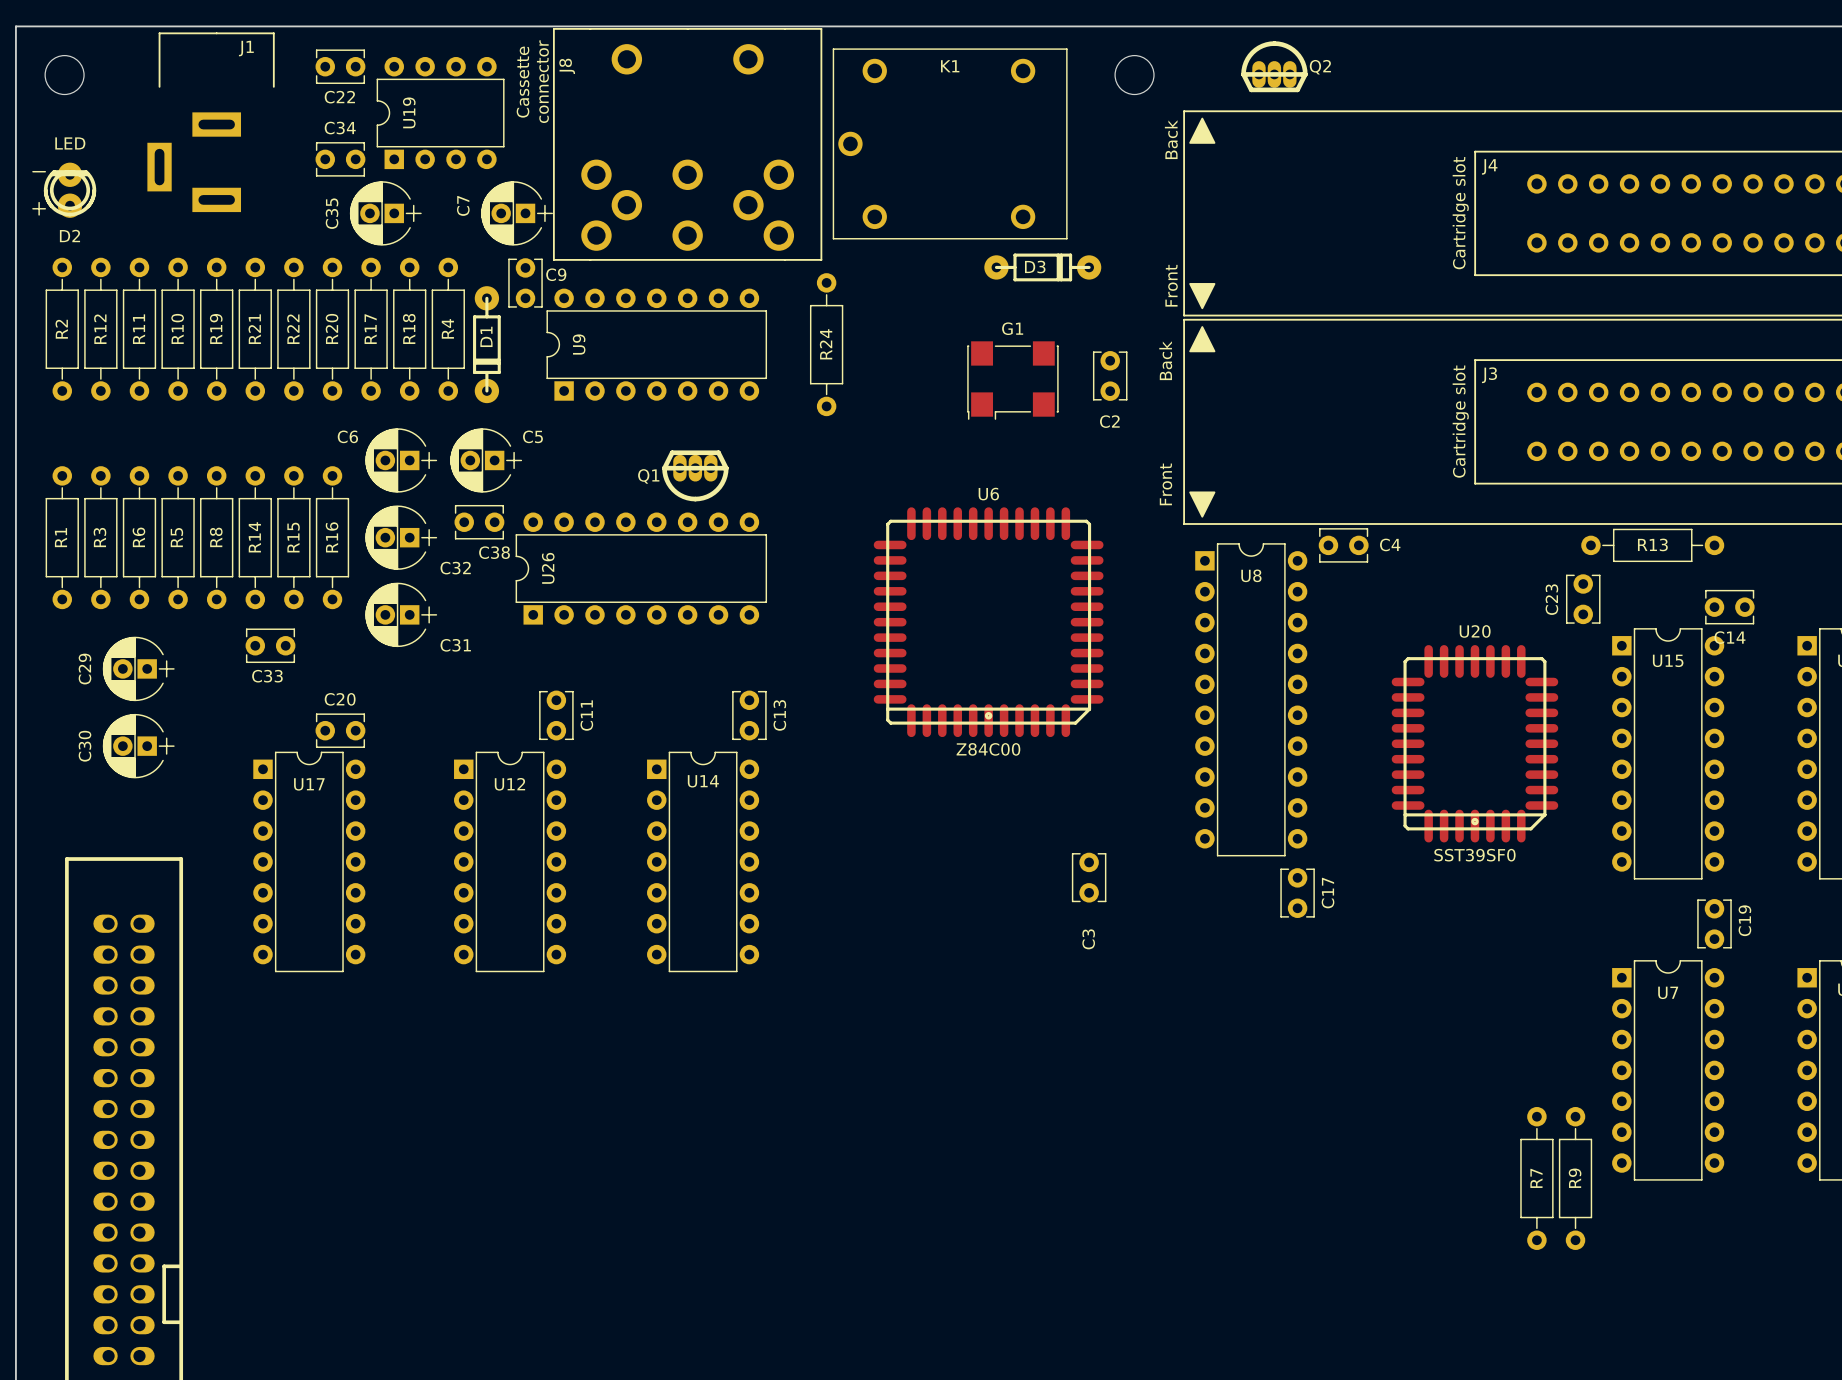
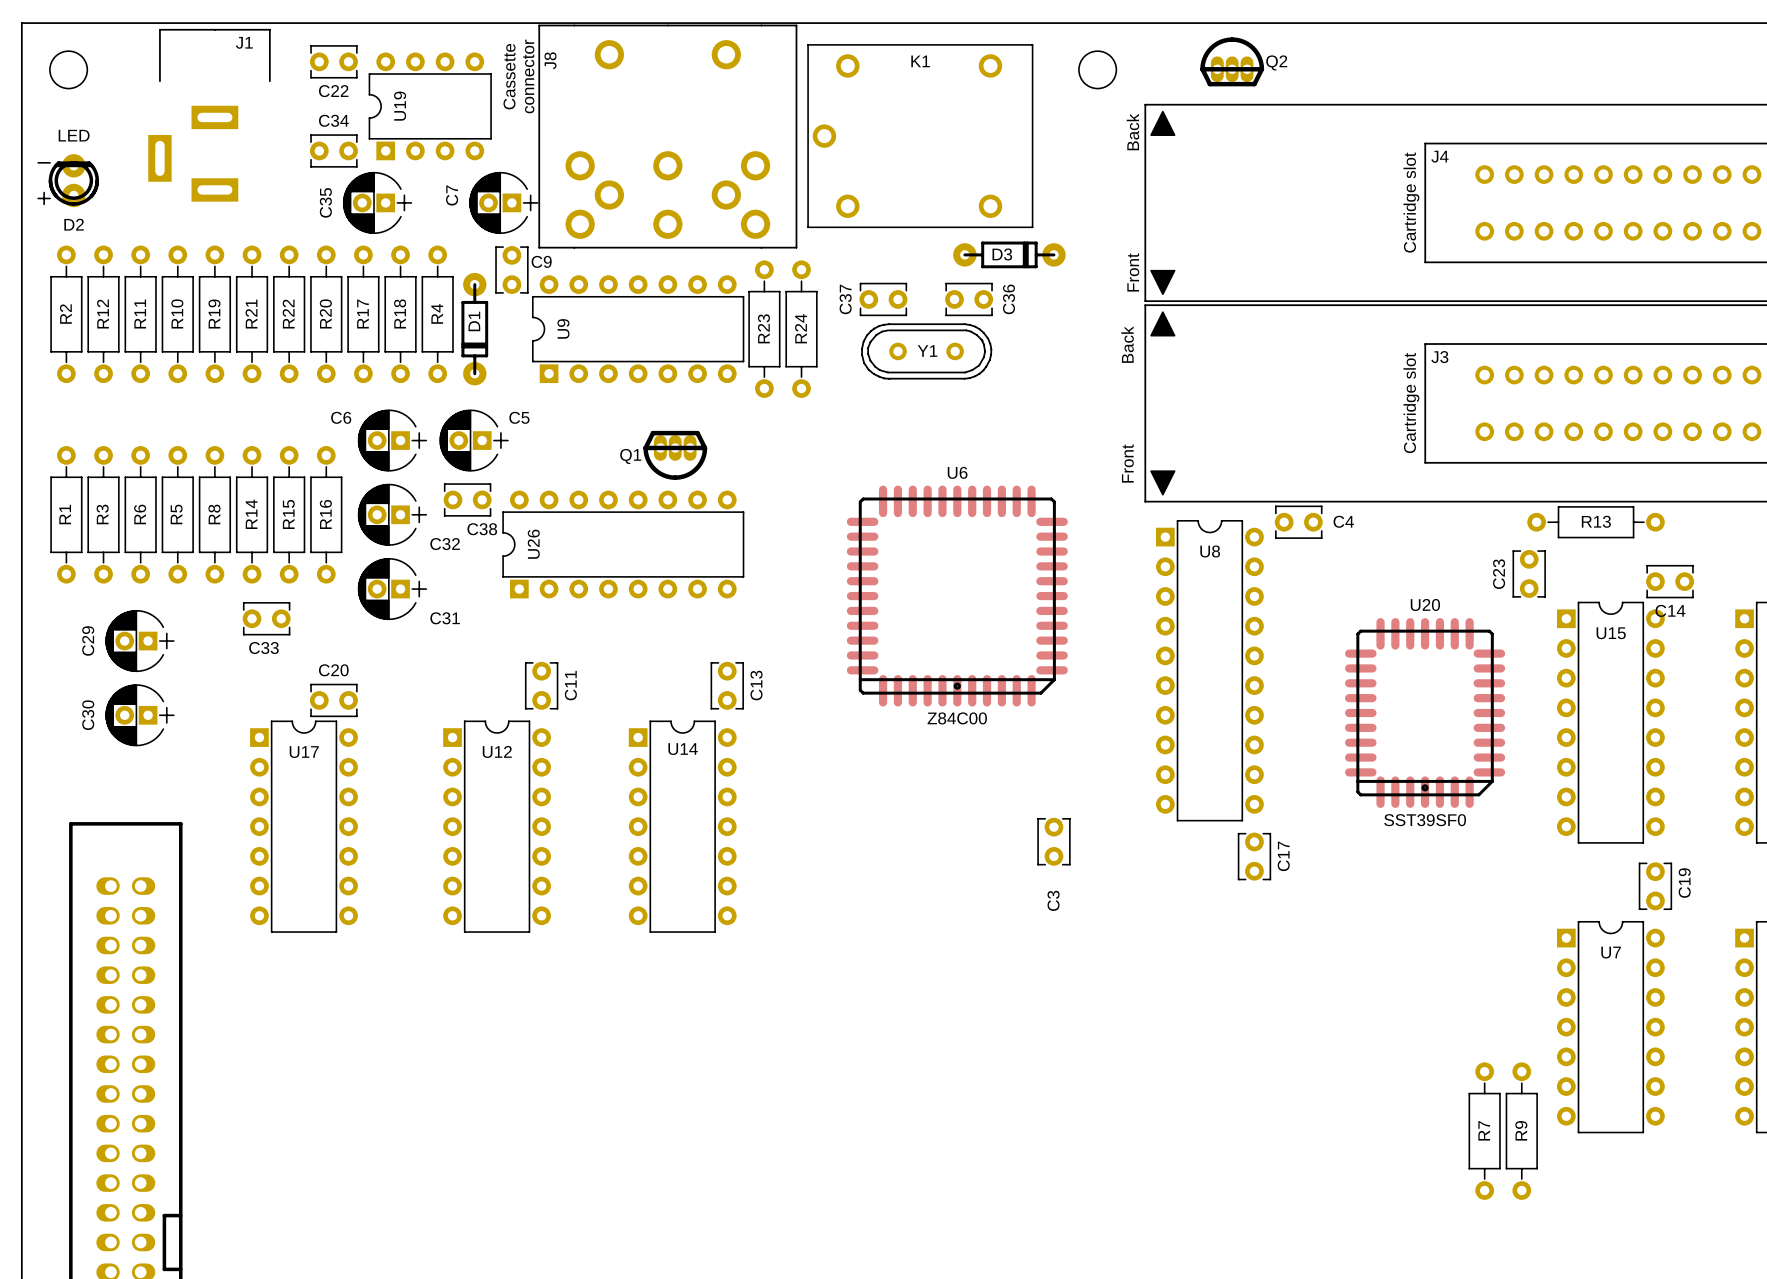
C36: none -> (883, 299)
C37: none -> (969, 299)
R23: none -> (764, 329)
Y1: none -> (926, 351)
C2: (1110, 375) -> none
G1: (1012, 380) -> none

